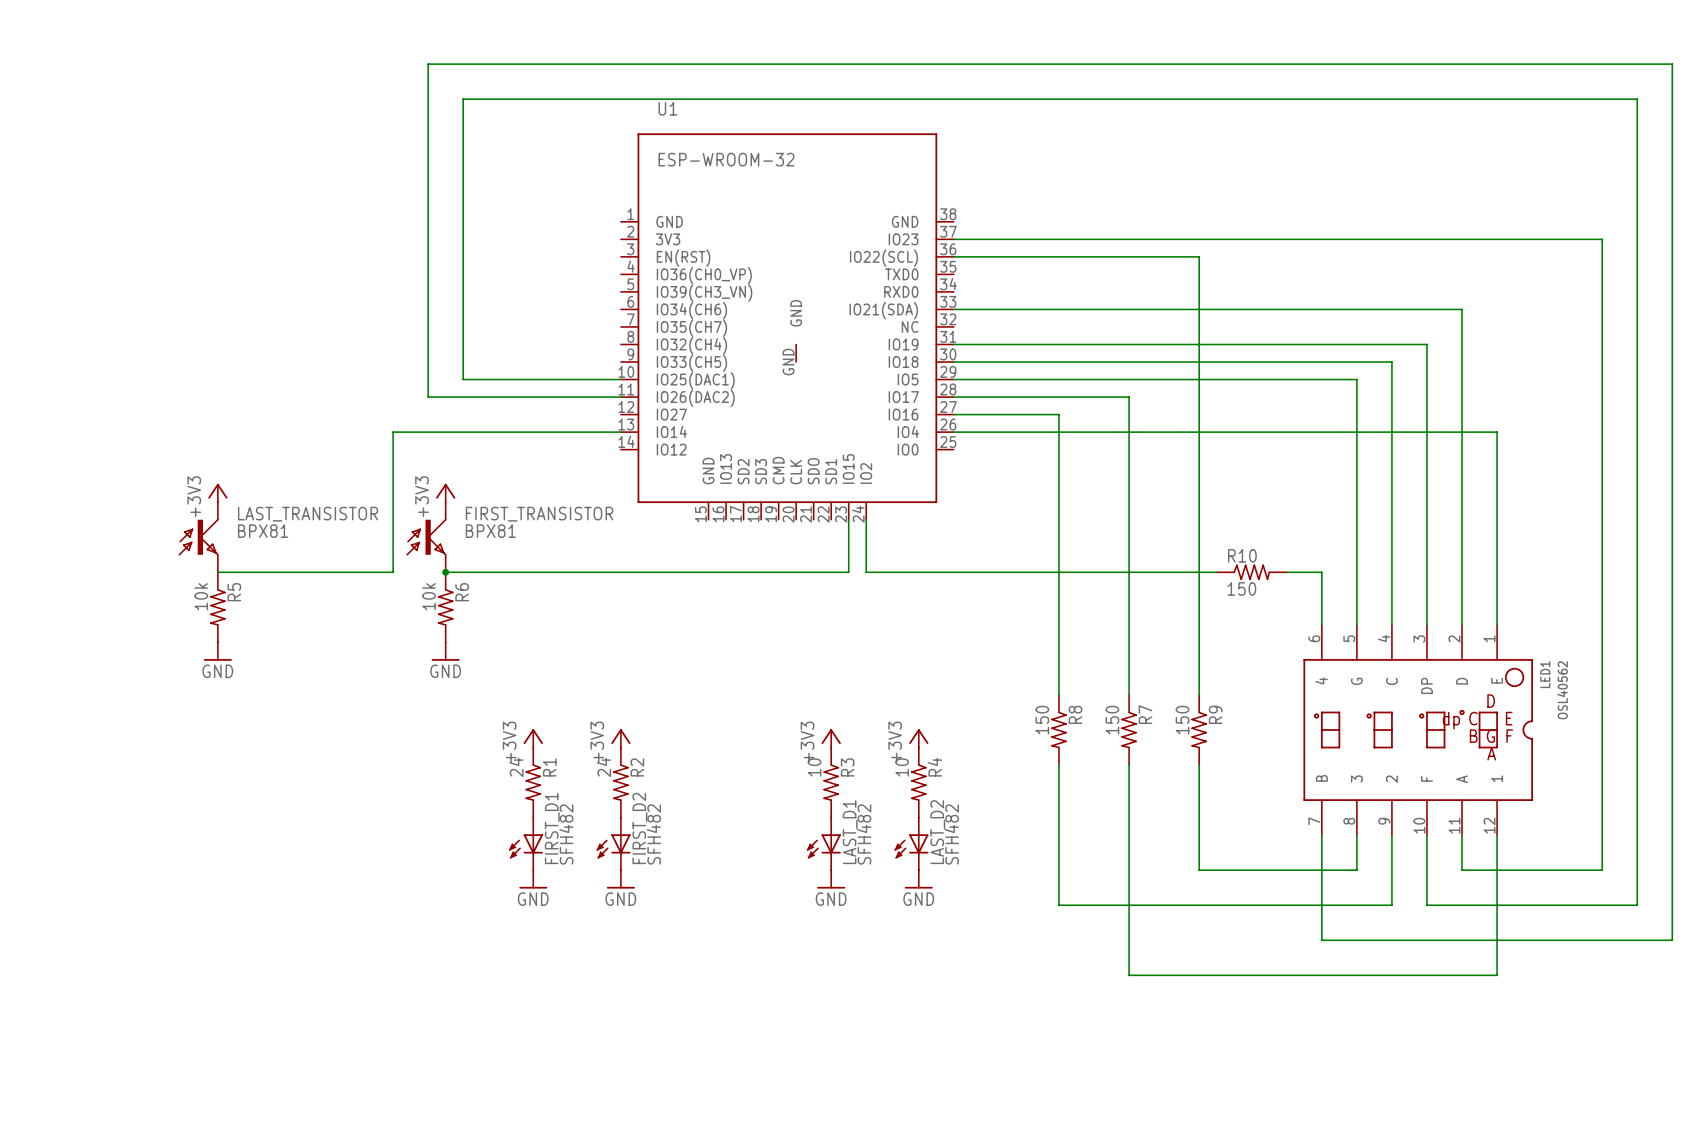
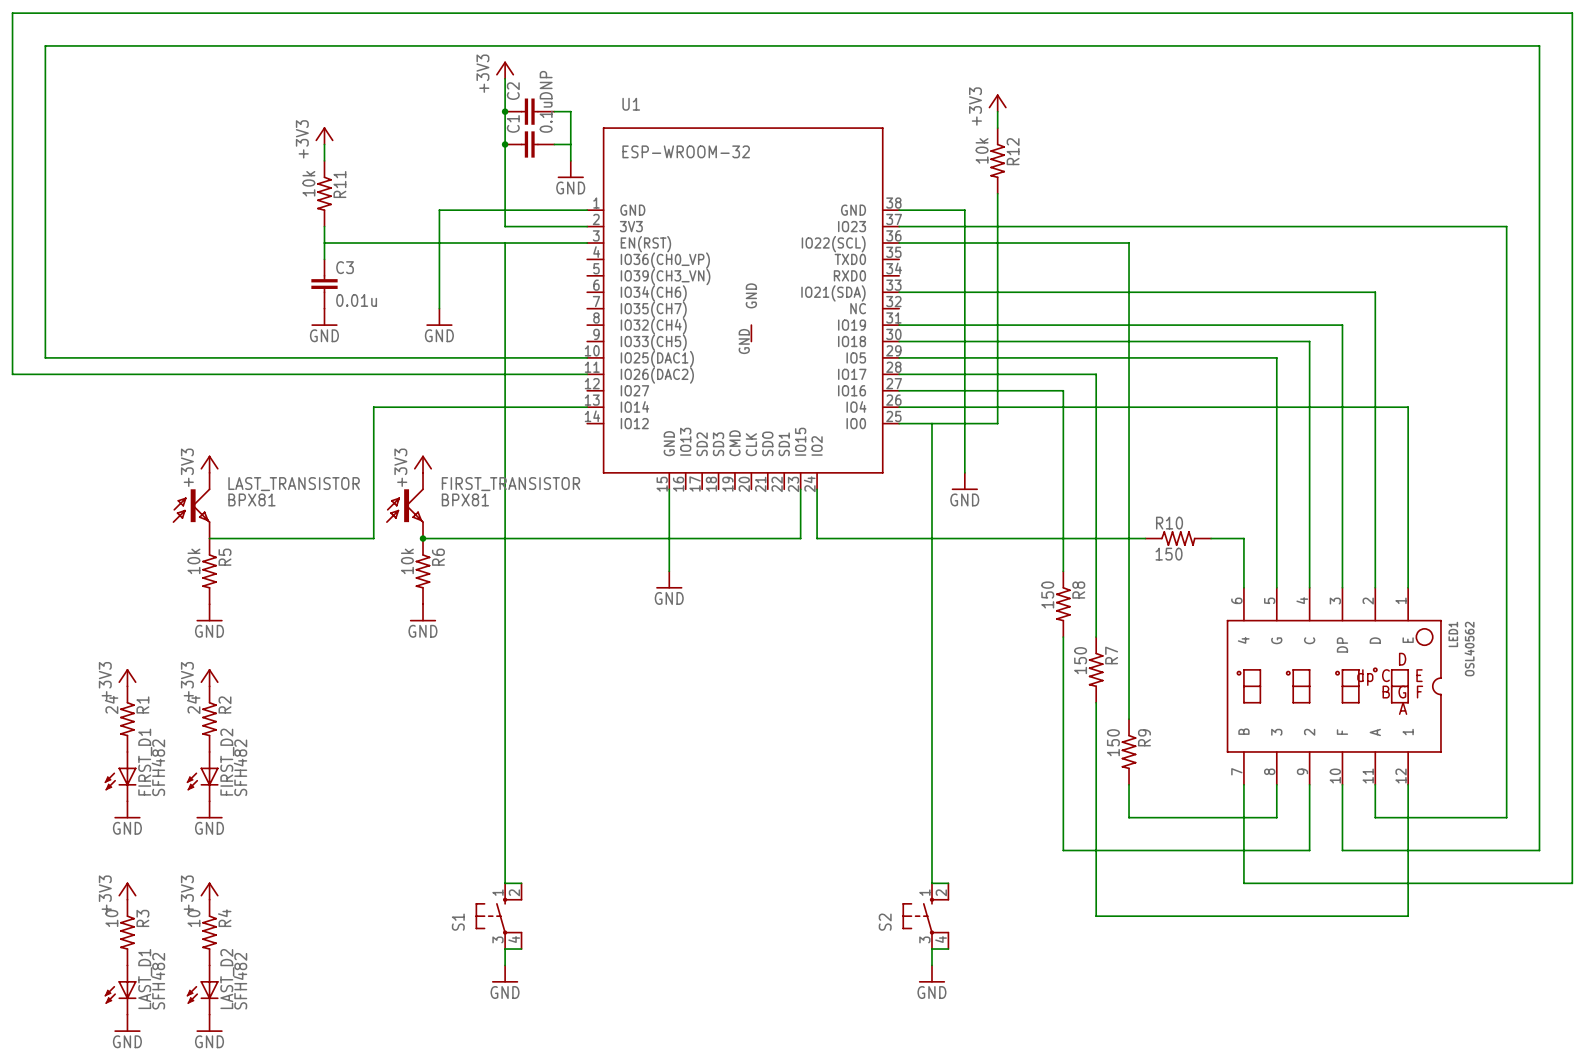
wire: (1672, 64) (428, 64) (428, 397) -> (1572, 62) (1572, 13) (12, 13) (12, 374) (406, 374)
power symbol: none -> +3V3 (505, 70)
wire: none -> (505, 78) (505, 226) (587, 226)
wire: (1637, 99) (463, 99) (463, 221) -> (1539, 95) (1539, 45) (45, 45) (45, 357) (439, 357)
power symbol: none -> +3V3 (997, 103)
junction: none -> (505, 111)
C2: none -> DNP (529, 111)
wire: none -> (554, 111) (570, 111) (570, 160)
wire: none -> (997, 111) (997, 128)
power symbol: none -> +3V3 (324, 135)
wire: none -> (324, 144) (324, 160)
junction: none -> (505, 144)
C1: none -> 0.1u (529, 144)
wire: none -> (554, 144) (570, 144)
R12: none -> 10k (997, 160)
power symbol: none -> GND (570, 169)
R11: none -> 10k (324, 193)
wire: none -> (439, 210) (587, 210)
wire: none -> (899, 210) (964, 210) (964, 472)
wire: none -> (324, 226) (324, 259)
wire: none -> (324, 243) (587, 243)
wire: none -> (505, 243) (505, 883) (521, 883)
C3: none -> 0.01u (324, 284)
wire: (463, 326) (463, 379) -> none
power symbol: none -> GND (324, 317)
power symbol: none -> GND (439, 317)
wire: (1129, 397) (1129, 414) -> (997, 193) (997, 390) (1063, 390)
wire: none -> (1063, 374) (1096, 374) (1096, 637)
wire: none -> (931, 423) (931, 883) (948, 883)
wire: (1058, 449) (1058, 694) -> (997, 423) (899, 423)
power symbol: none -> GND (964, 481)
wire: none -> (669, 489) (669, 571)
power symbol: none -> GND (669, 580)
power symbol: none -> +3V3 (127, 677)
power symbol: none -> +3V3 (209, 677)
R8 position: (1058, 730) -> (1063, 604)
R7 position: (1129, 730) -> (1096, 669)
R9 position: (1199, 730) -> (1129, 751)
power symbol: +3V3 (533, 738) -> none
power symbol: +3V3 (620, 738) -> none
power symbol: +3V3 (831, 738) -> none
power symbol: +3V3 (918, 738) -> none
wire: (1058, 765) (1058, 905) (1129, 905) (1129, 975) (1164, 975) -> (1096, 702) (1096, 916)
R1 position: (533, 782) -> (127, 719)
R2 position: (620, 782) -> (209, 719)
R3 position: (831, 782) -> (127, 932)
R4 position: (918, 782) -> (209, 932)
FIRST_D1 position: (526, 843) -> (120, 776)
FIRST_D2 position: (613, 843) -> (202, 776)
LAST_D1 position: (823, 843) -> (120, 990)
LAST_D2 position: (911, 843) -> (202, 990)
power symbol: none -> GND (127, 809)
power symbol: none -> GND (209, 809)
power symbol: GND (533, 879) -> none
power symbol: GND (620, 879) -> none
power symbol: GND (831, 879) -> none
power symbol: GND (918, 879) -> none
power symbol: none -> +3V3 (127, 891)
power symbol: none -> +3V3 (209, 891)
S1: none -> (498, 916)
S2: none -> (925, 916)
wire: none -> (521, 949) (505, 949) (505, 965)
wire: none -> (948, 949) (931, 949) (931, 965)
power symbol: none -> GND (505, 974)
power symbol: none -> GND (931, 974)
power symbol: none -> GND (127, 1023)
power symbol: none -> GND (209, 1023)

